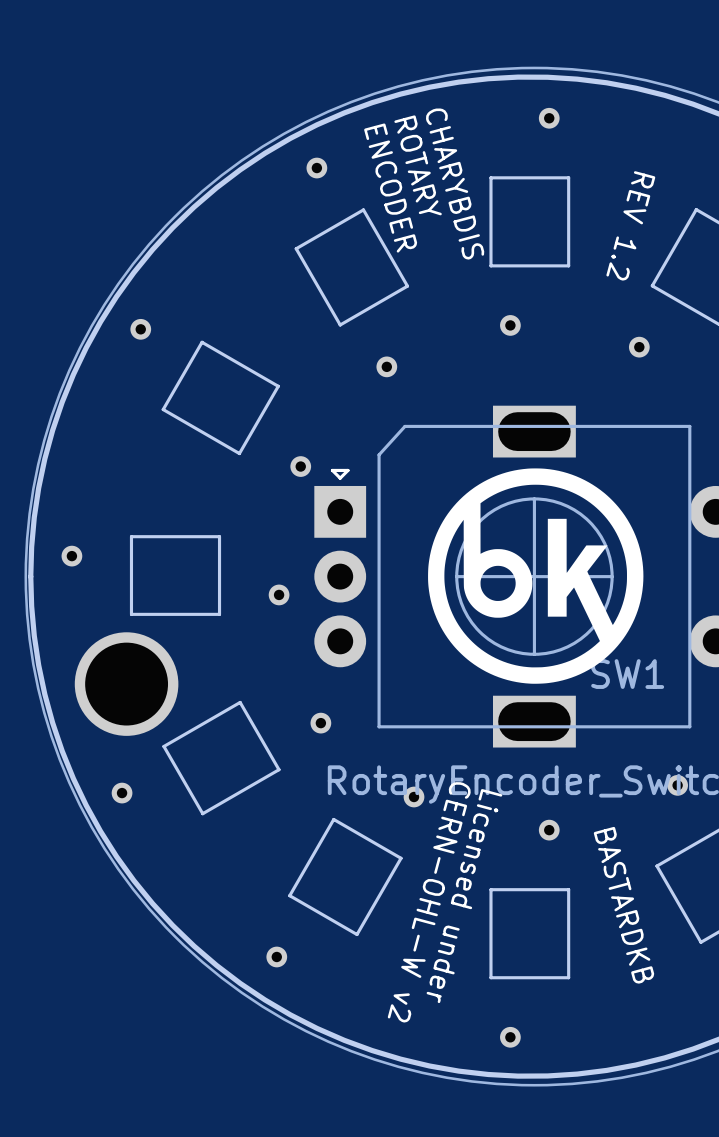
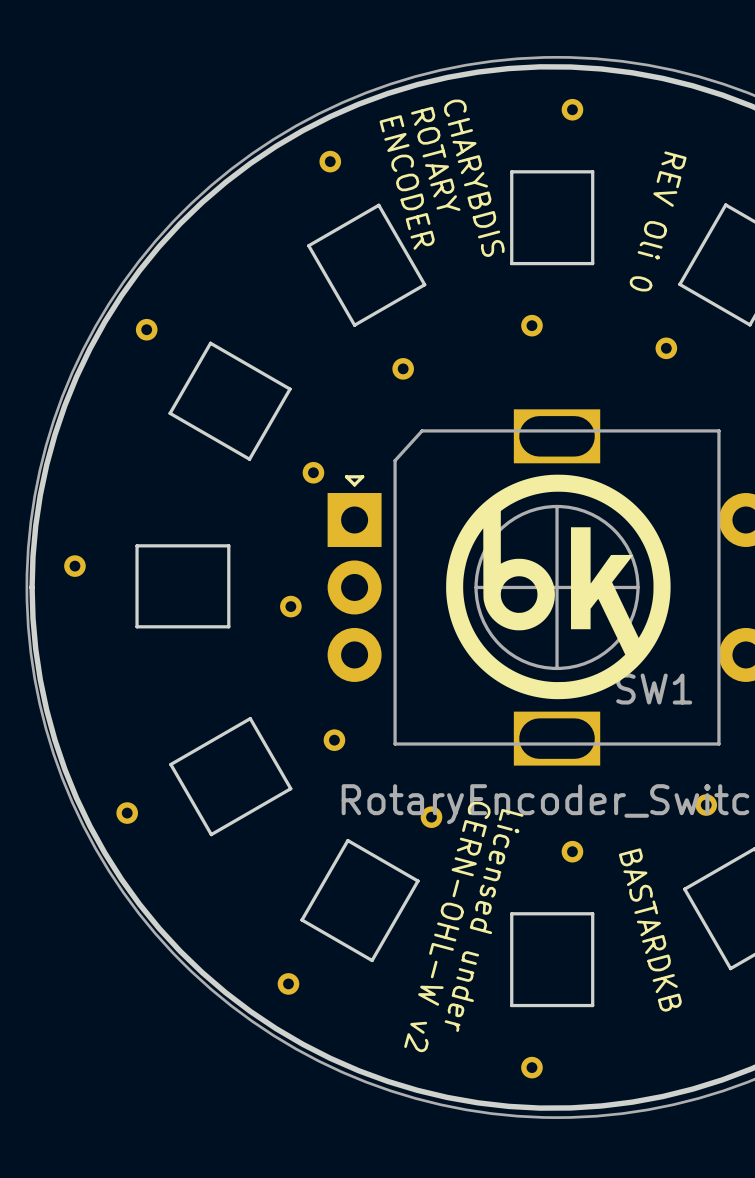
text: REV 1.2 (630, 225) -> REV Oli 0 (658, 221)
part: (126, 684) -> none

